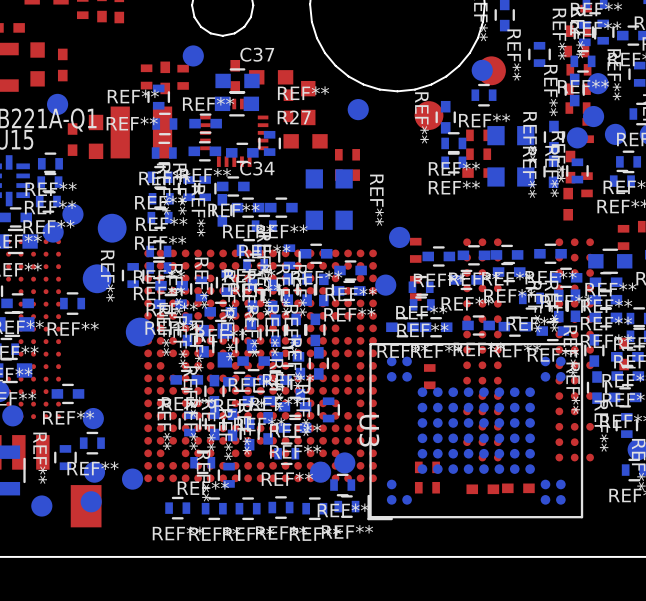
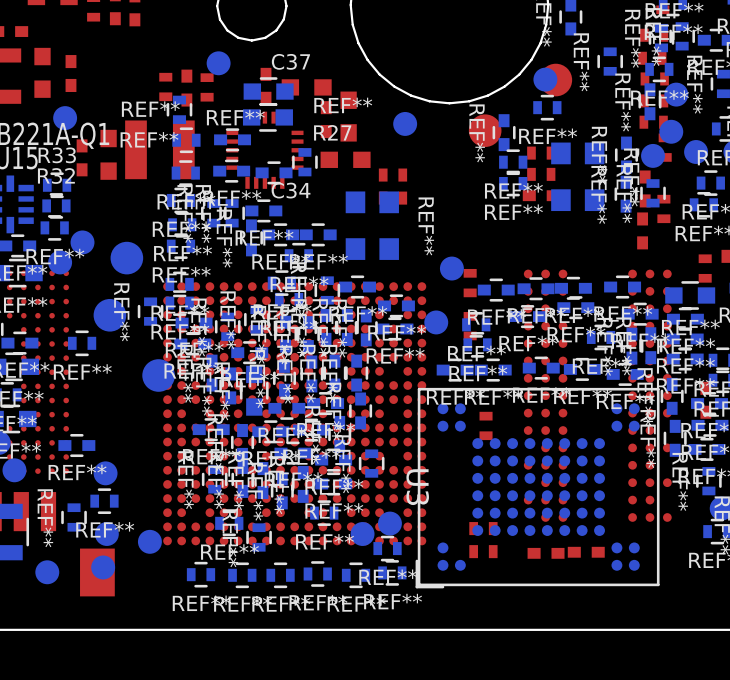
REF** name: REF** (51, 189) -> R33 (57, 155)
REF** name: REF** (50, 207) -> R32 (56, 176)

